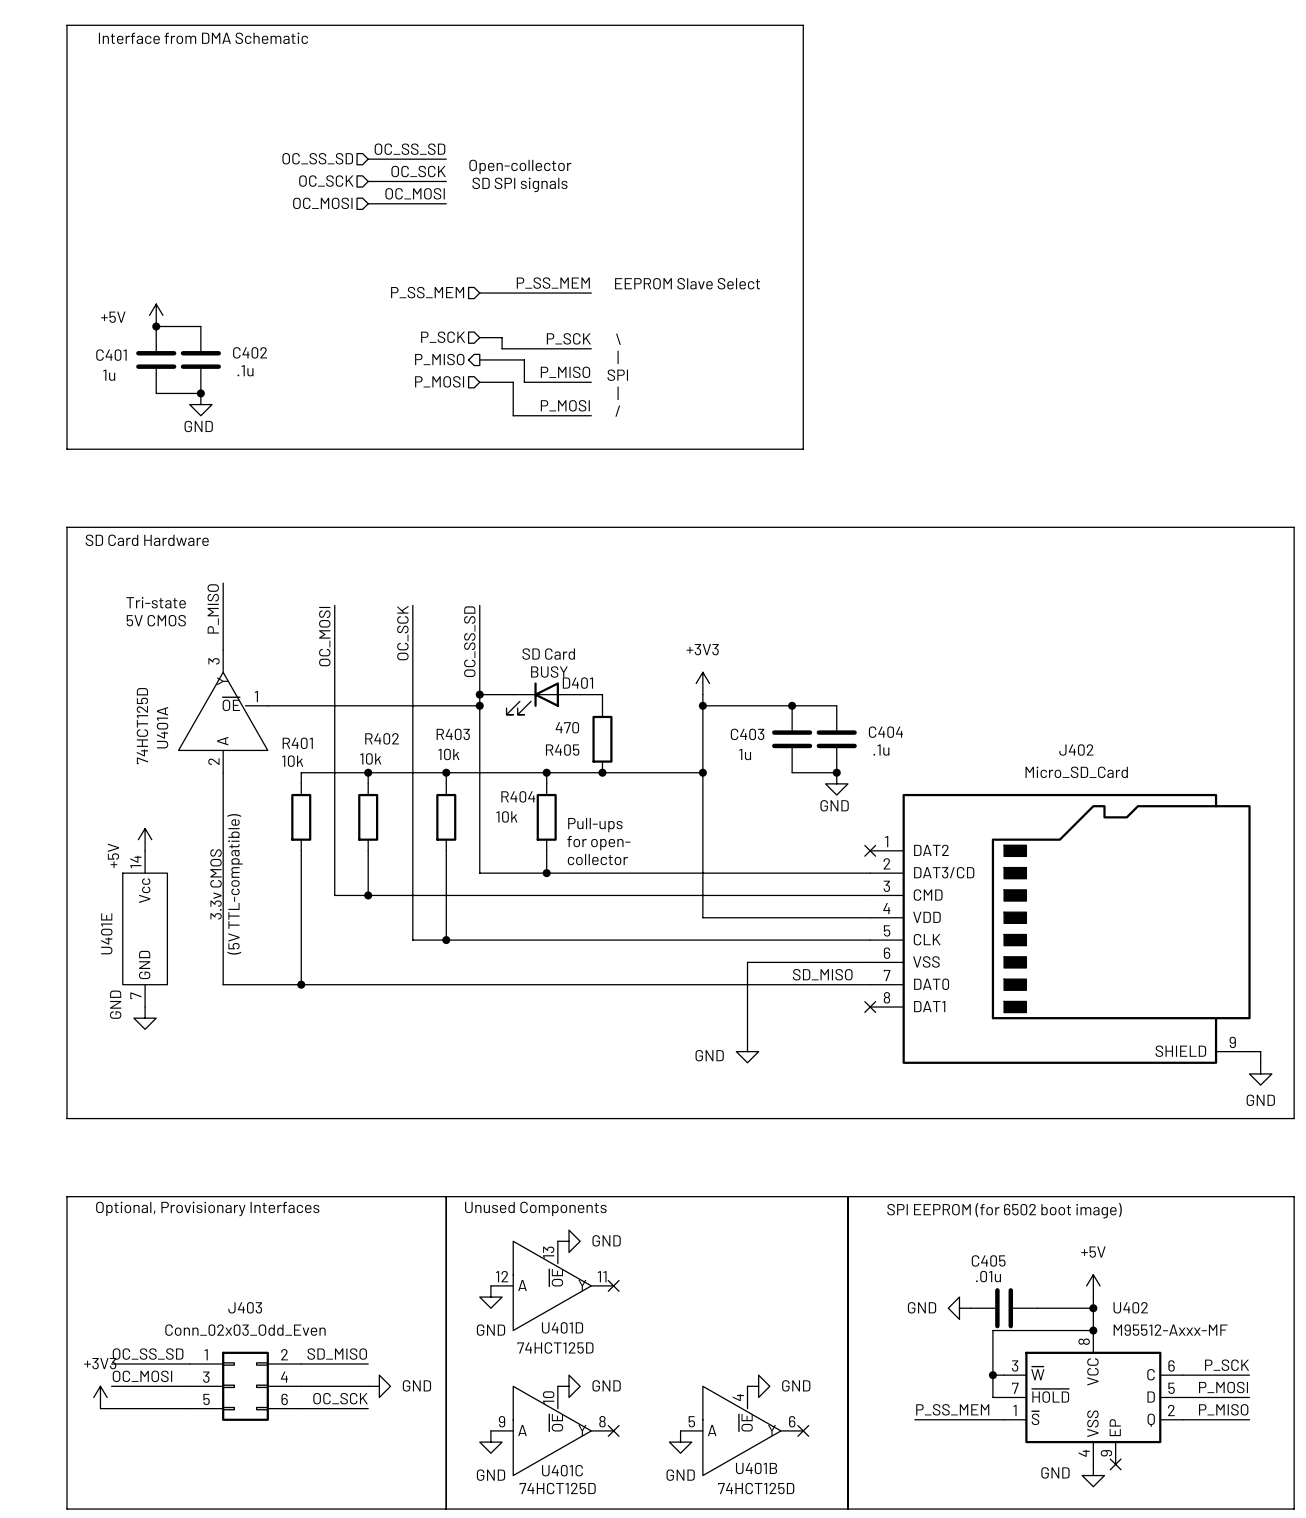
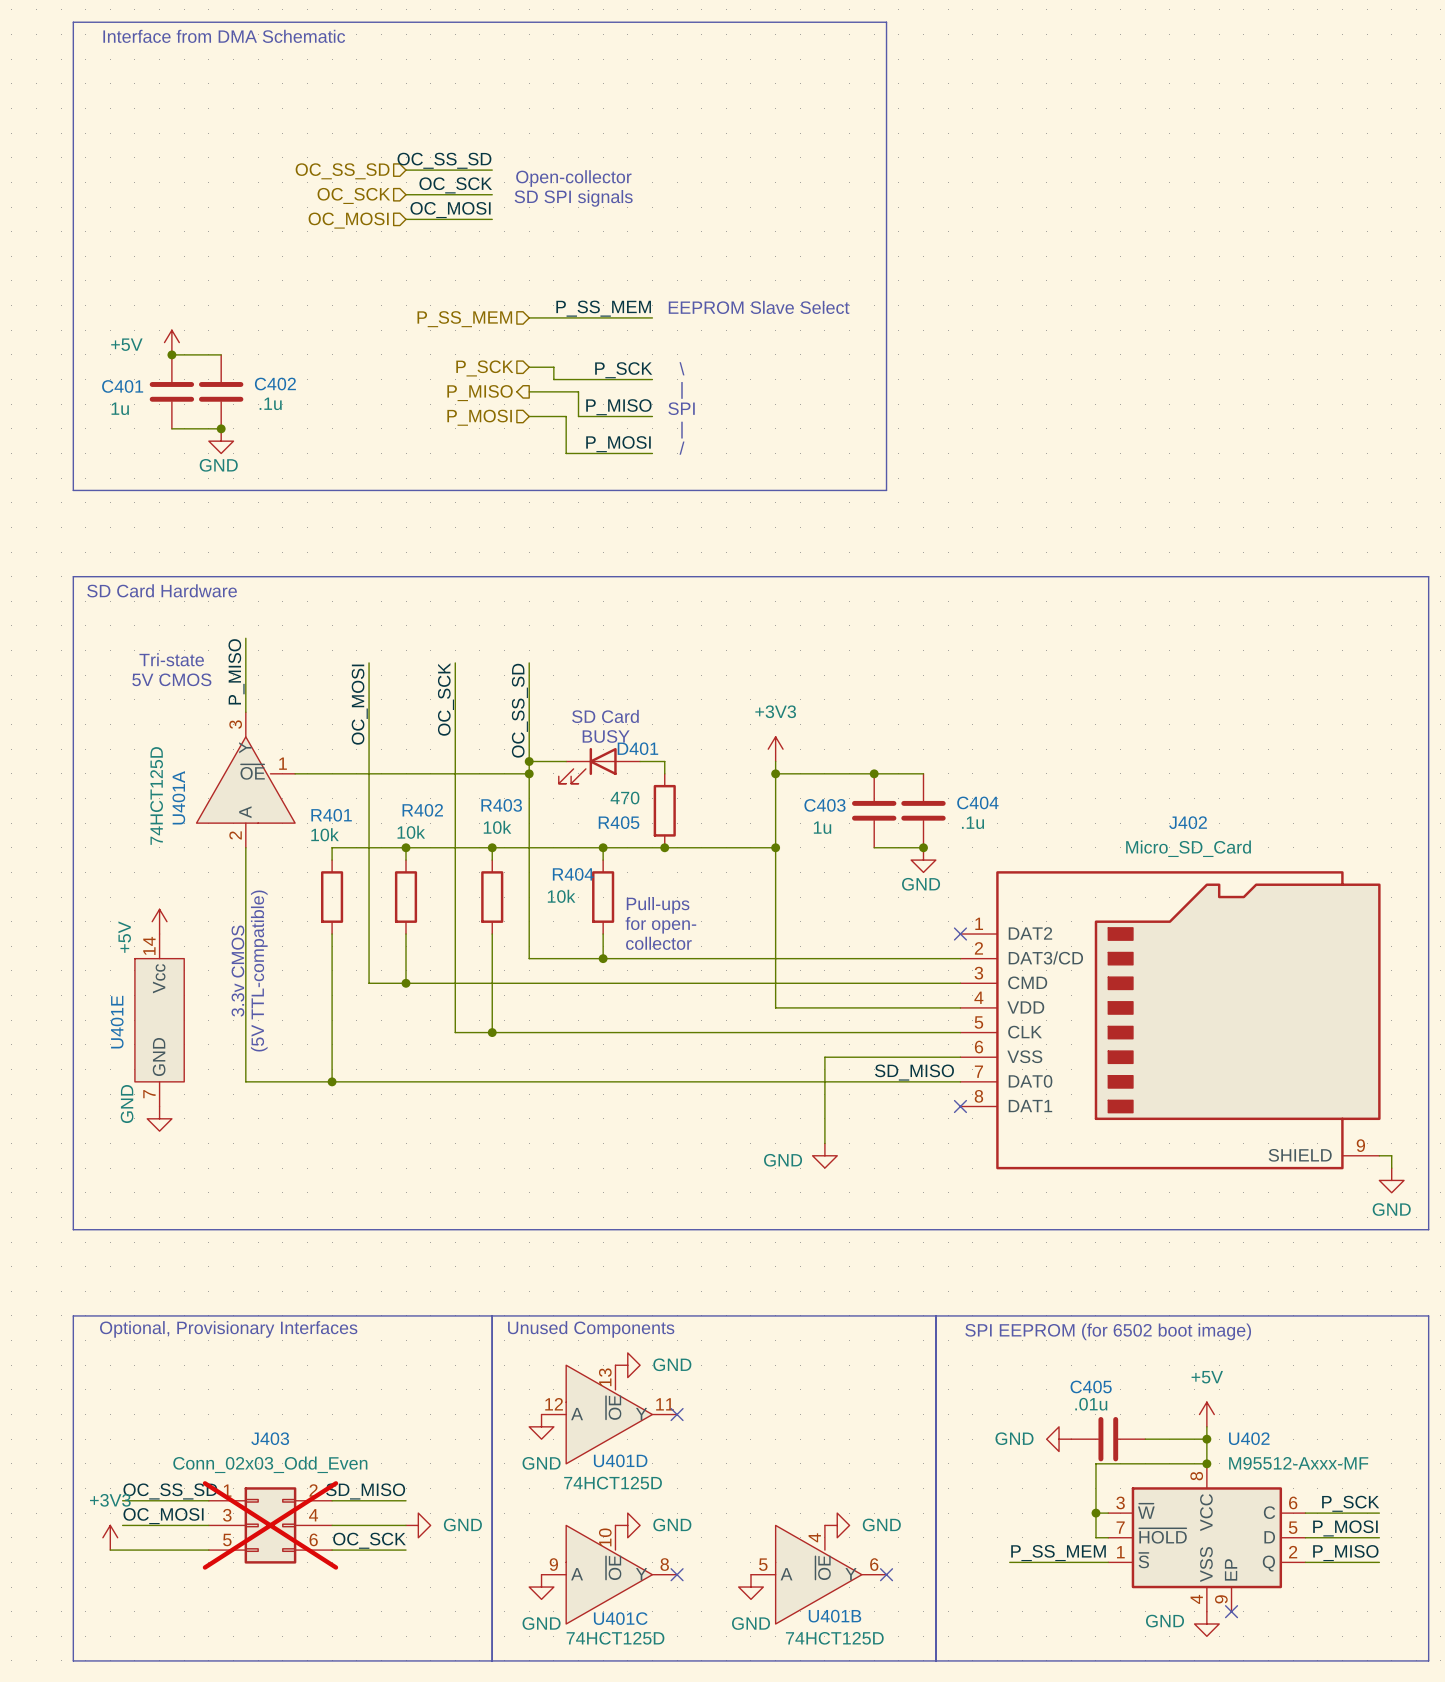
J403 do-not-place cross: none -> (270, 1525)

